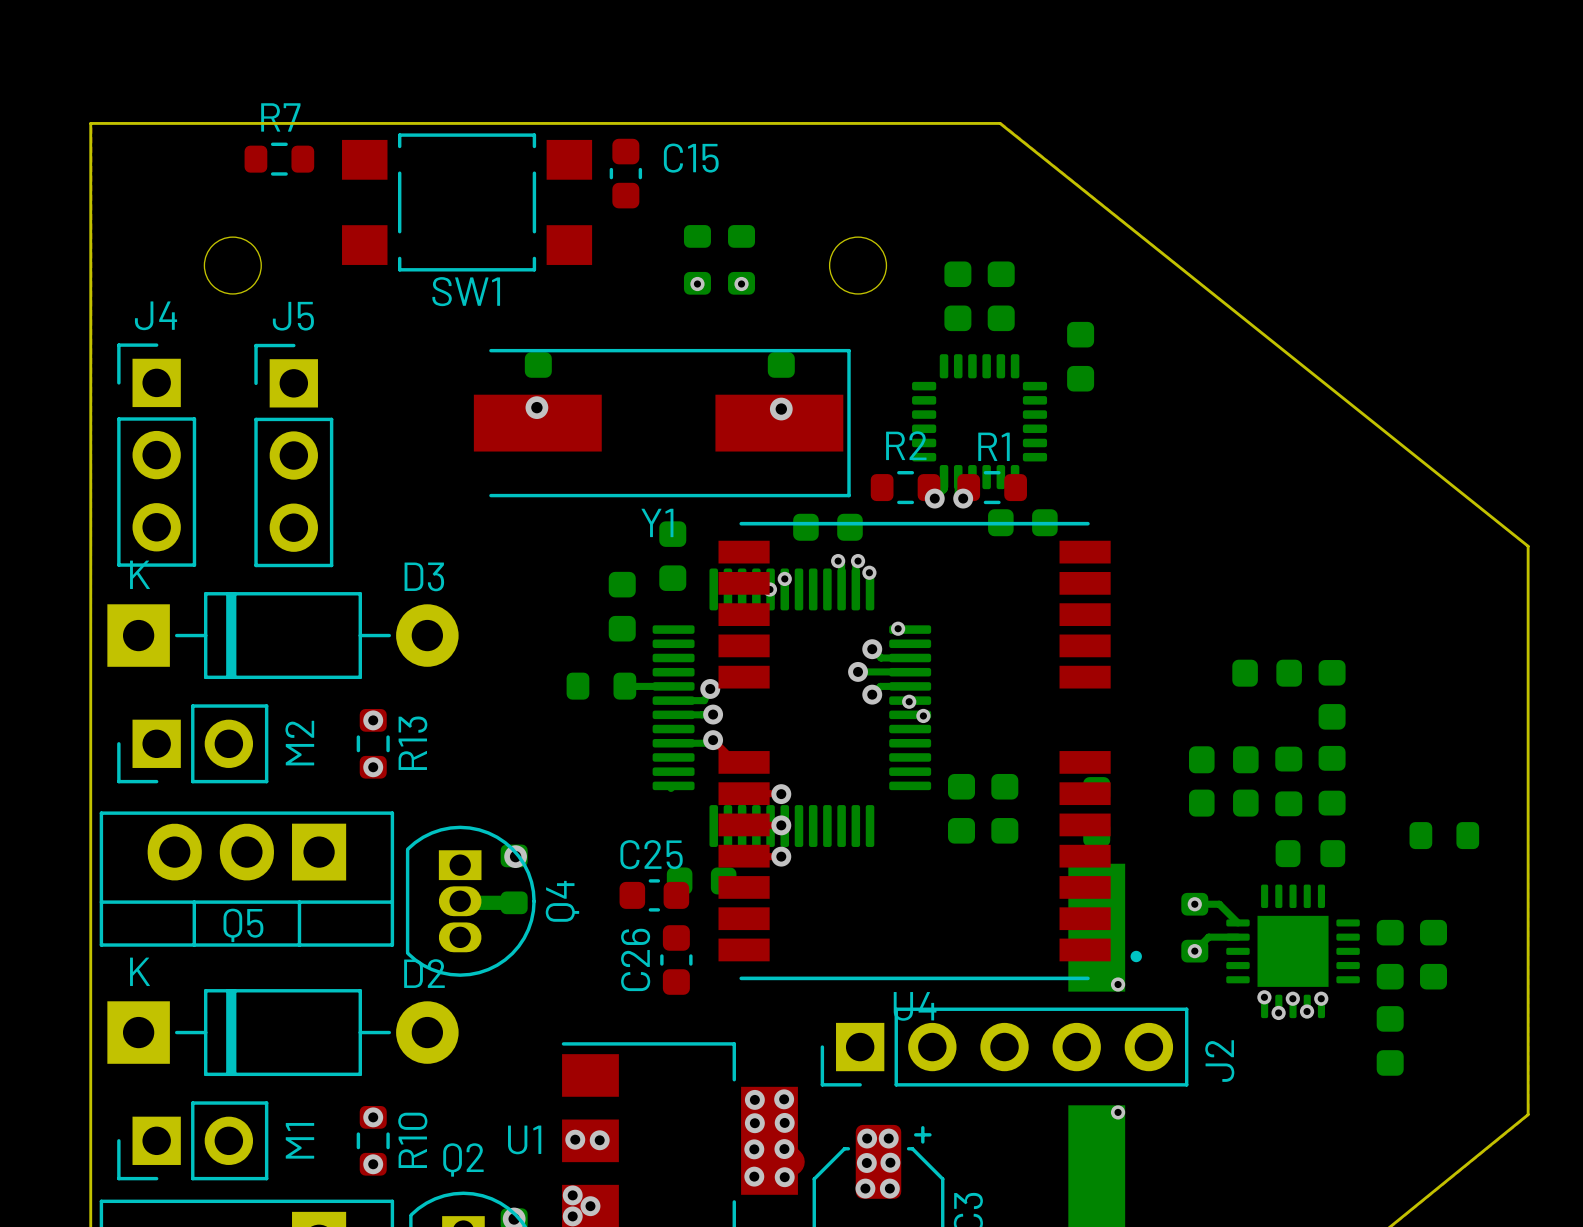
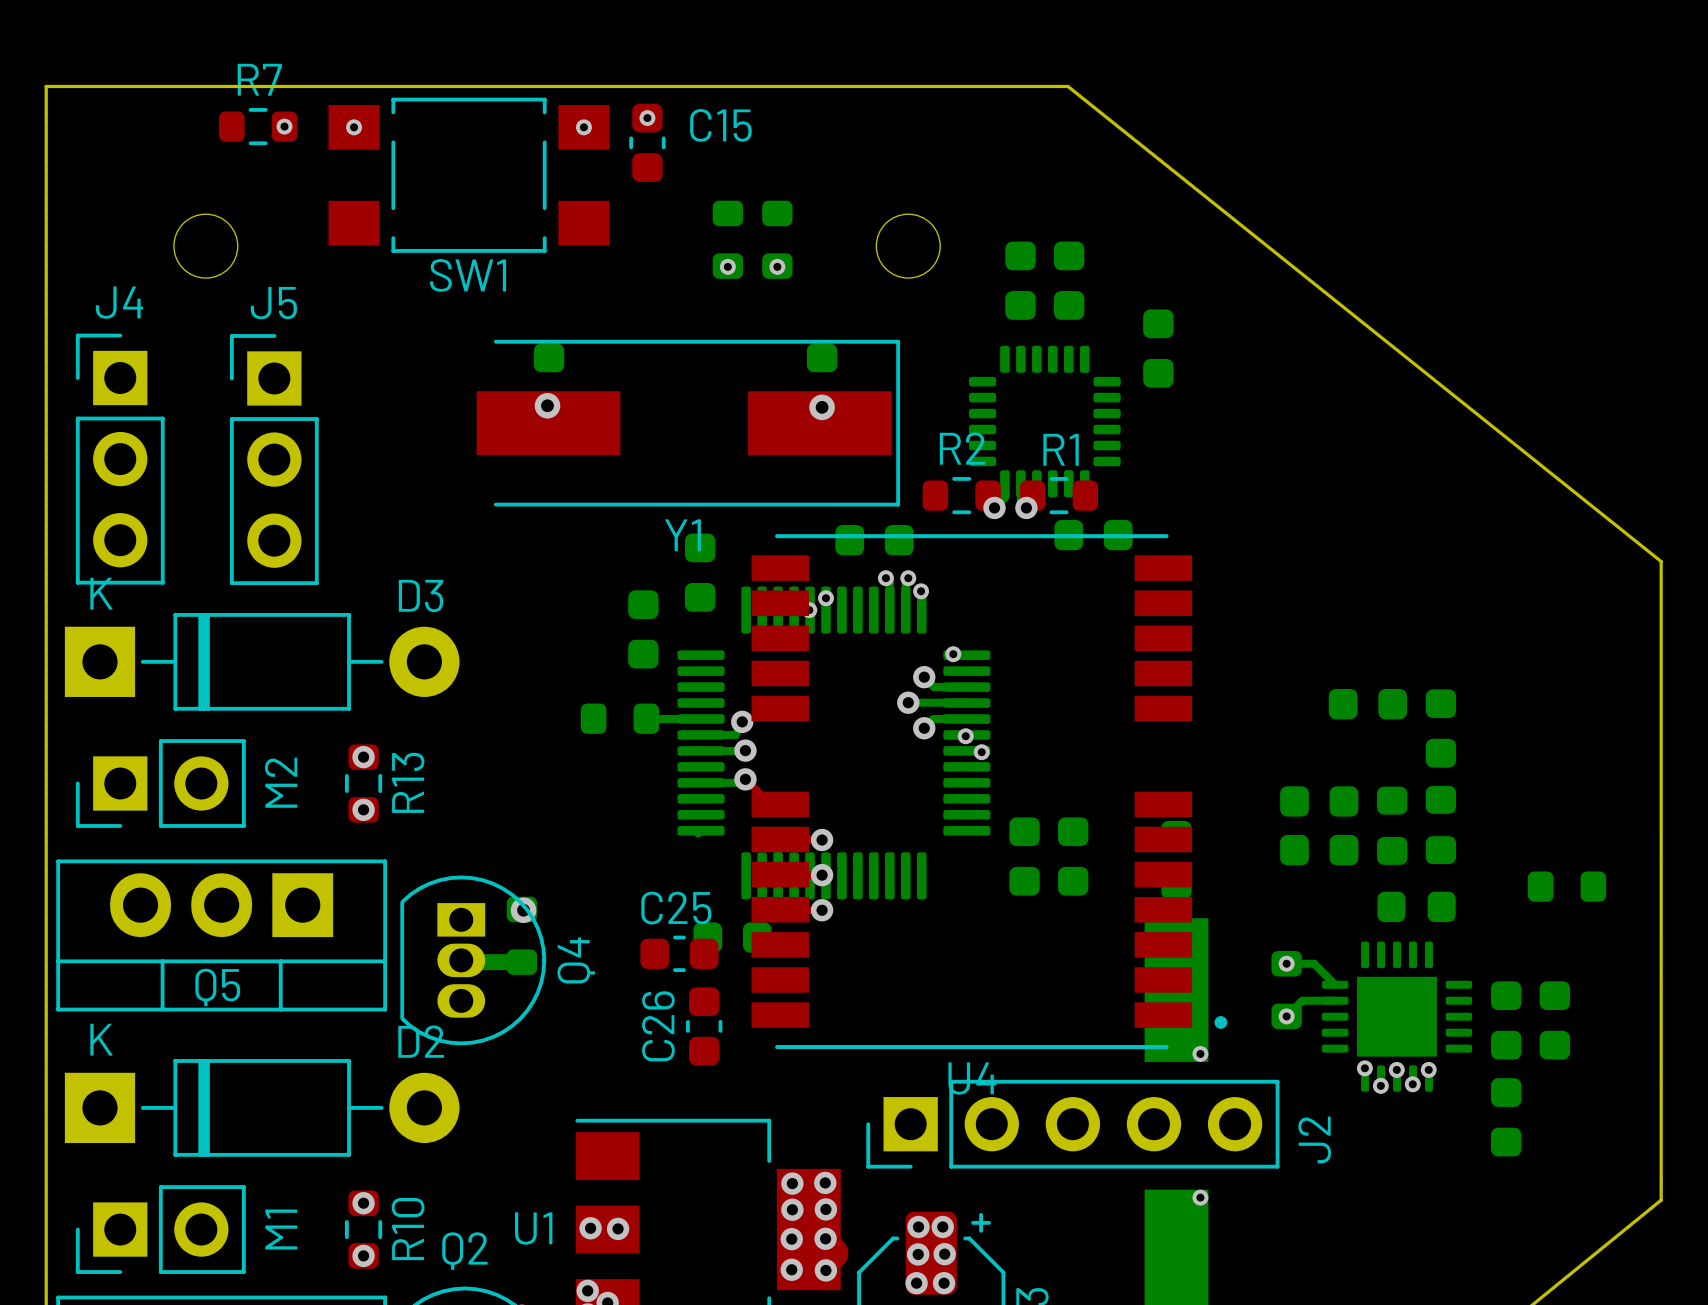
via: none -> (647, 118)
via: none -> (284, 126)
via: none -> (354, 127)
via: none -> (583, 127)

